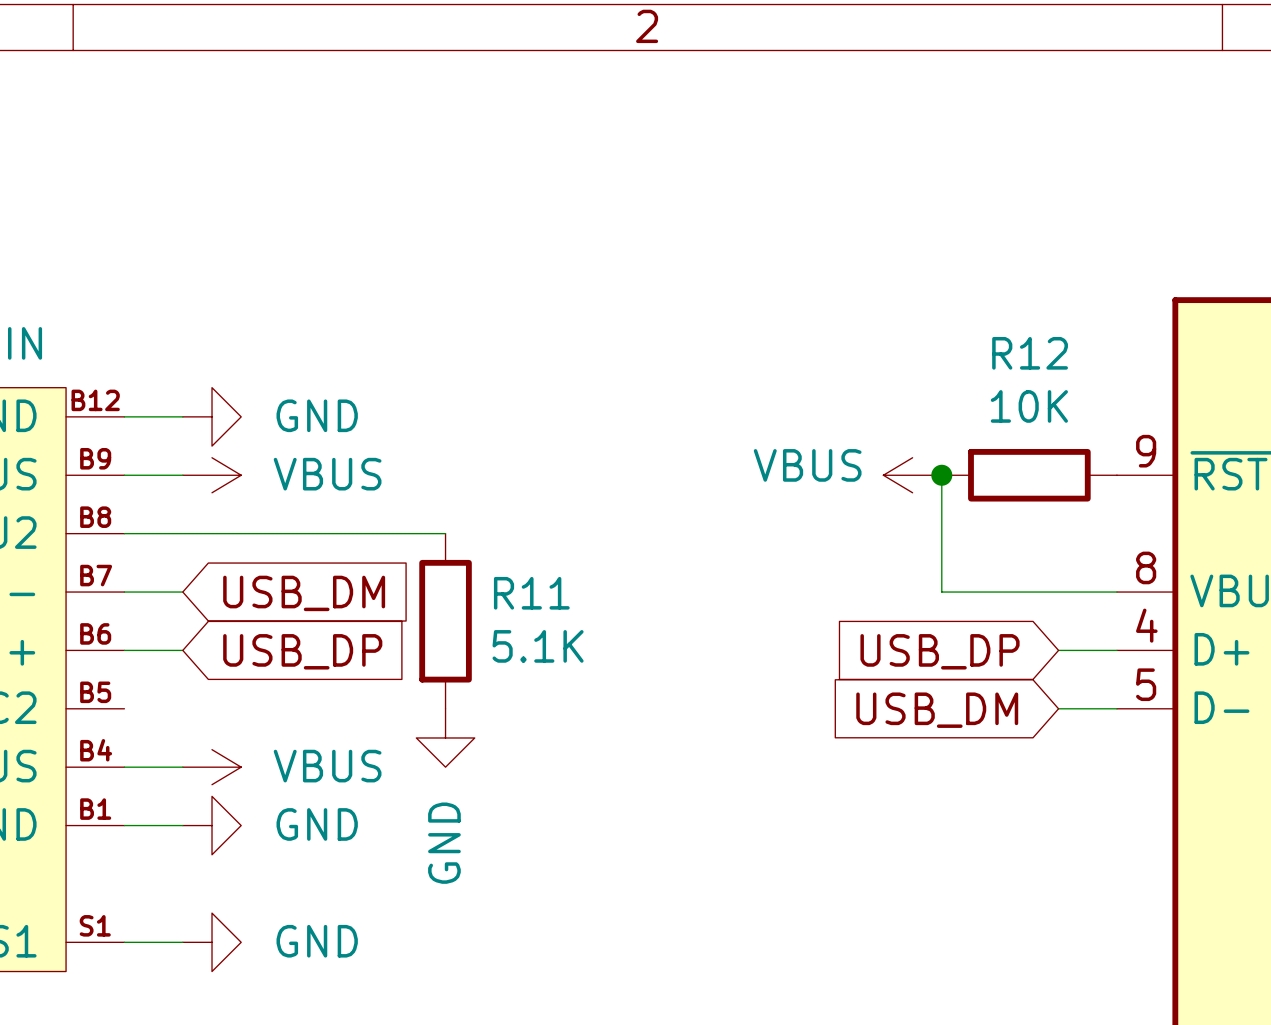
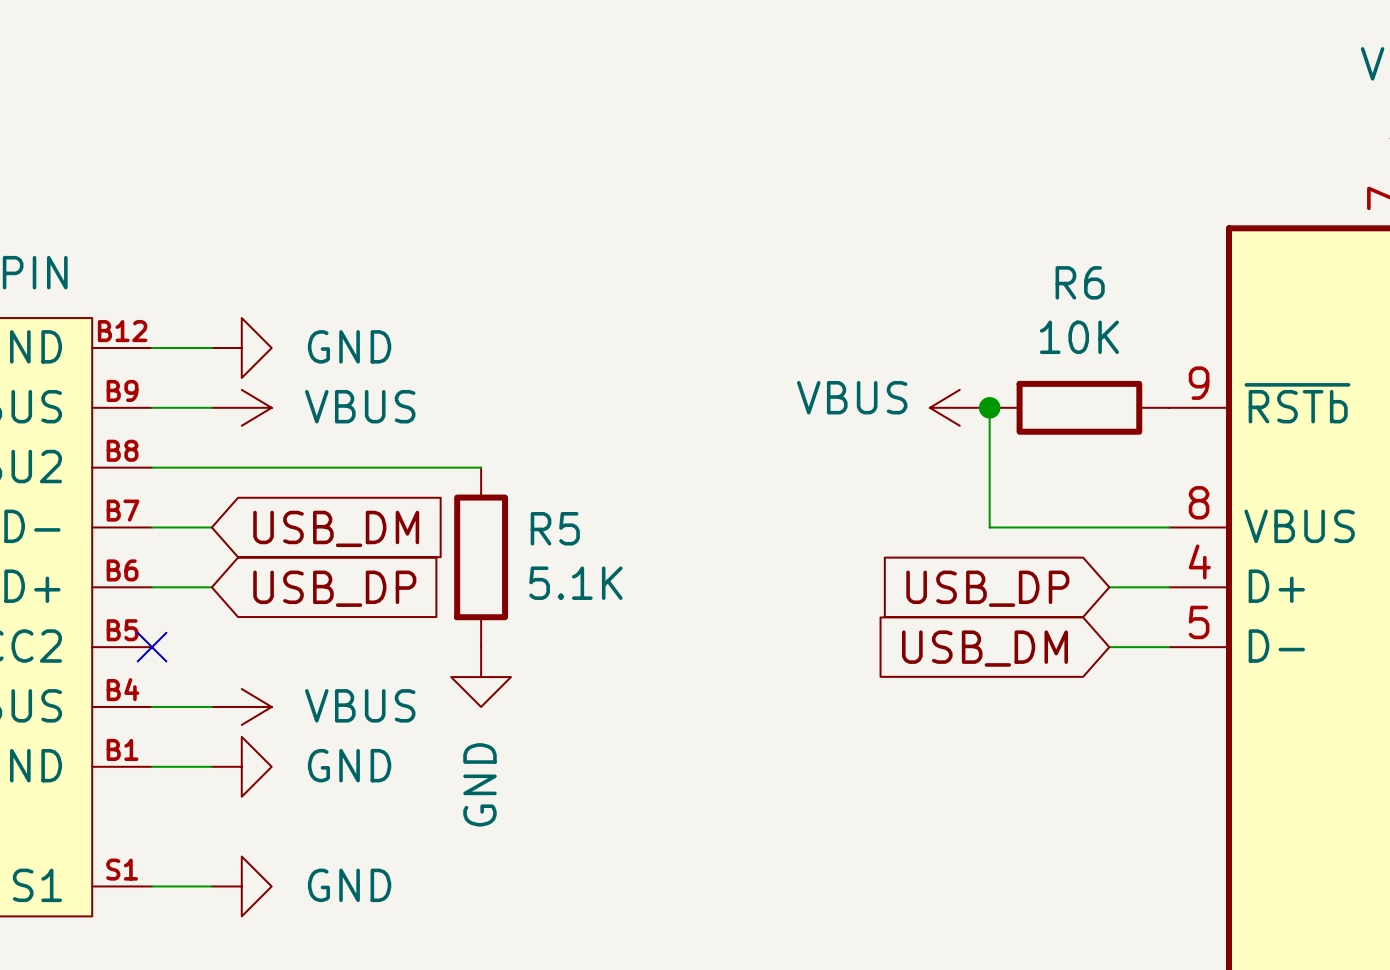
R12 name: R12 (1030, 353) -> R6 (1080, 282)
R11 name: R11 (531, 593) -> R5 (555, 528)
no-connect mark: none -> (152, 647)

